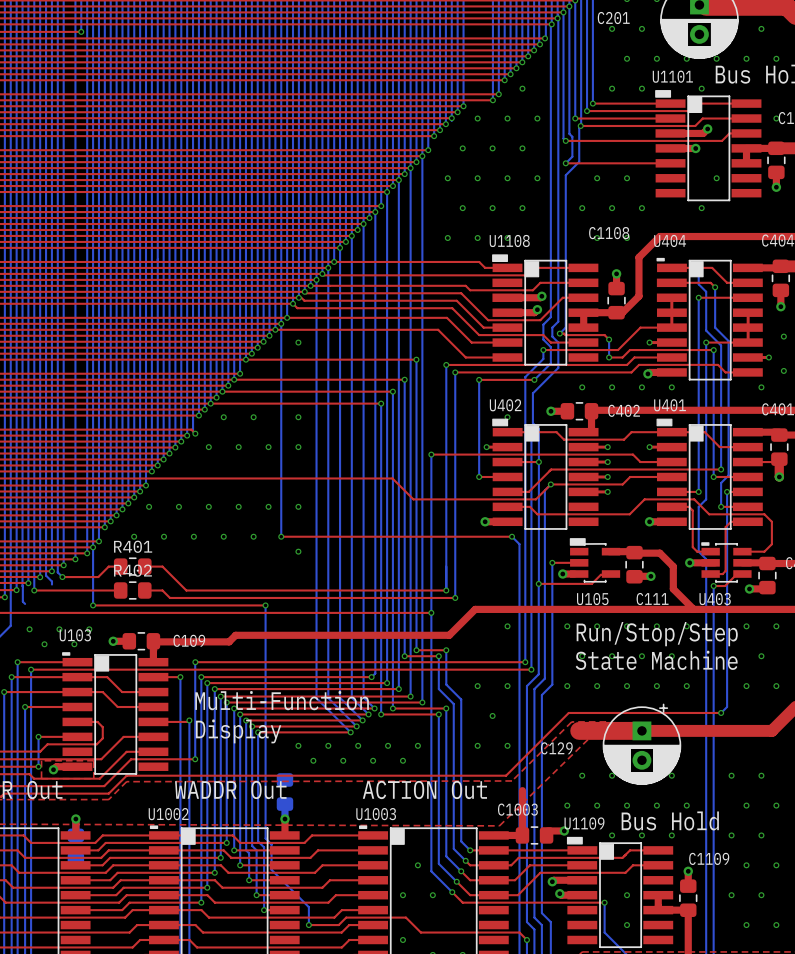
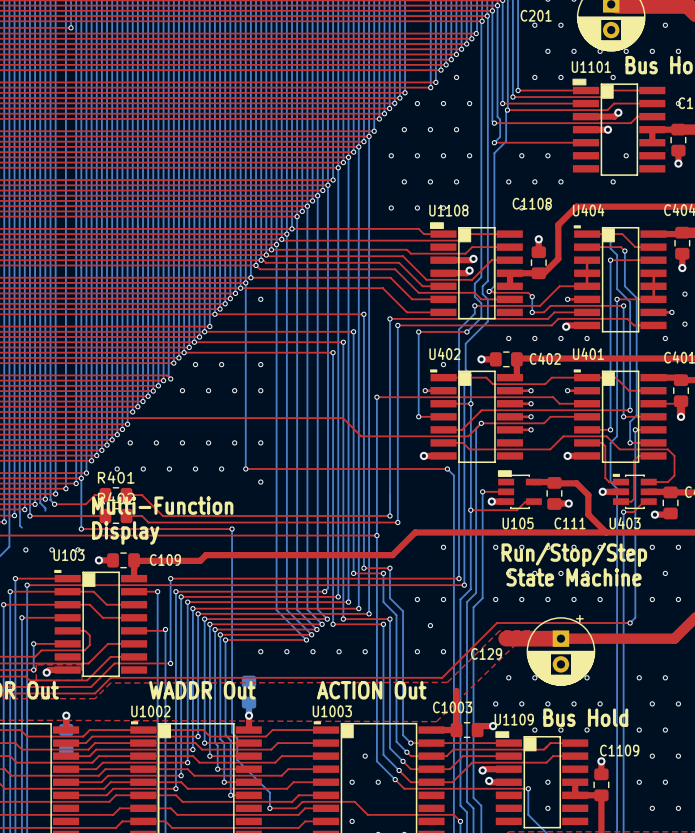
U402 footprint: [492, 418, 599, 530] -> [430, 369, 523, 463]
U401 footprint: [656, 418, 763, 530] -> [573, 369, 667, 463]
via: (44, 644) -> none
via: (74, 644) -> none
text position: Multi-Function (282, 700) -> Multi-Function (162, 505)
text position: Display (238, 731) -> Display (125, 533)
via: (313, 760) -> none
via: (343, 760) -> none
via: (373, 760) -> none
via: (402, 760) -> none

